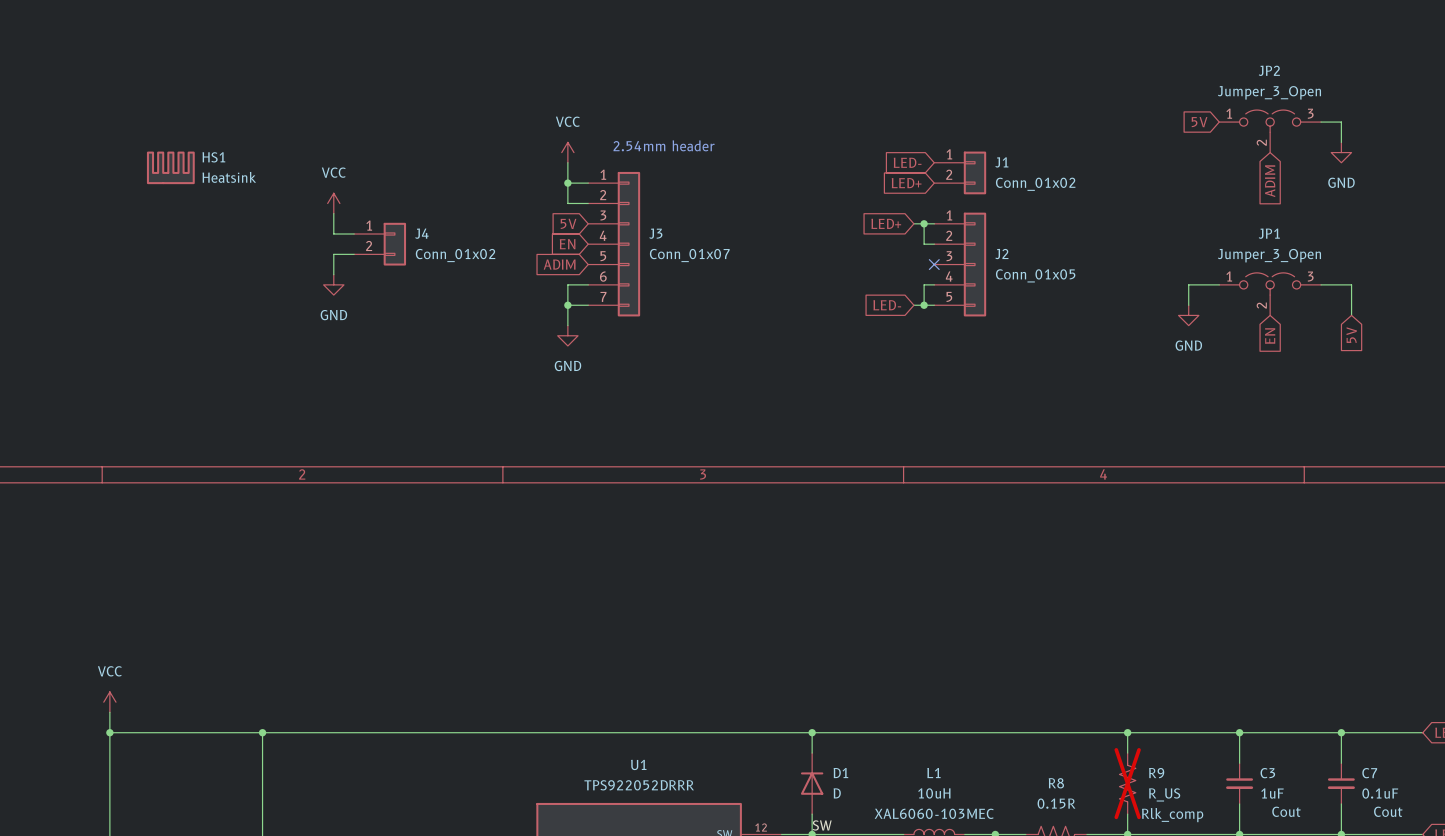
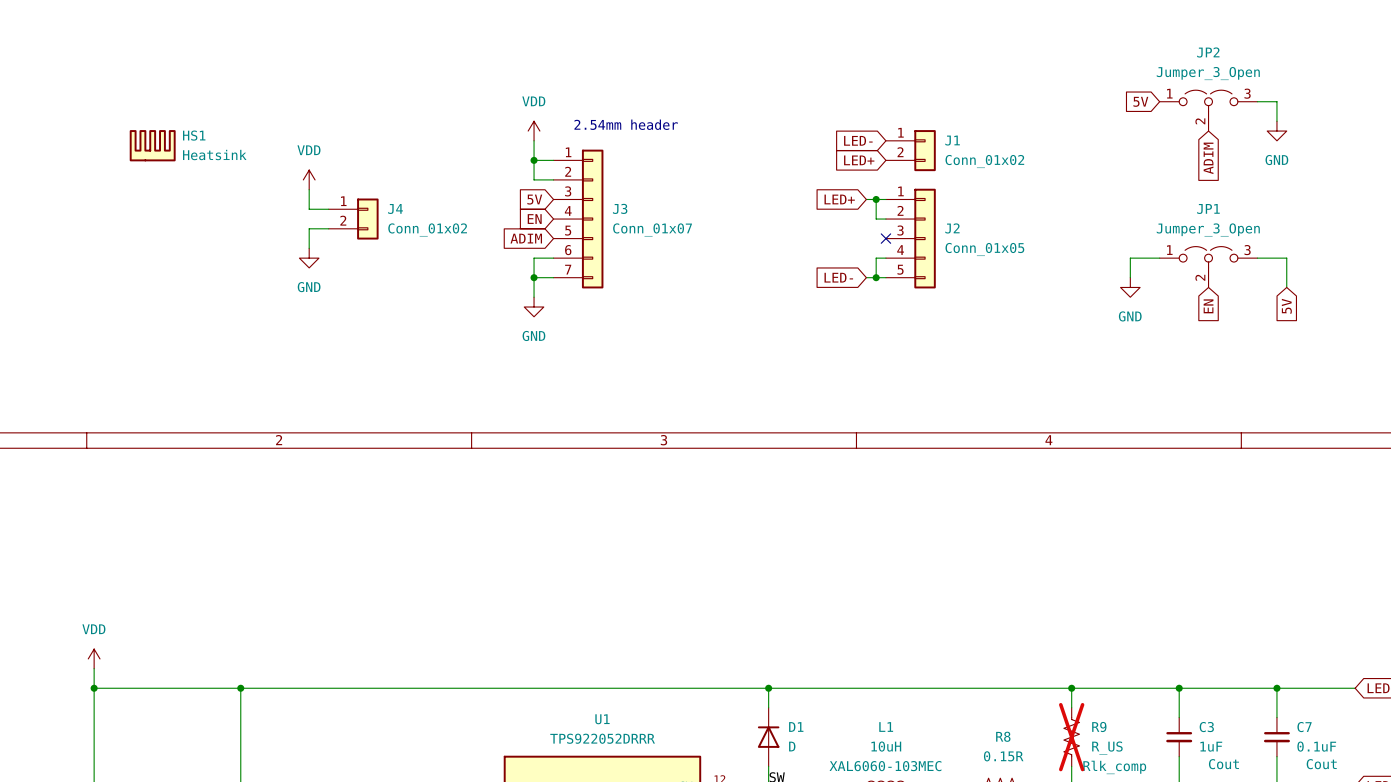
power symbol: VCC (567, 152) -> VDD (534, 131)
power symbol: VCC (333, 203) -> VDD (309, 179)
power symbol: VCC (109, 702) -> VDD (94, 658)

